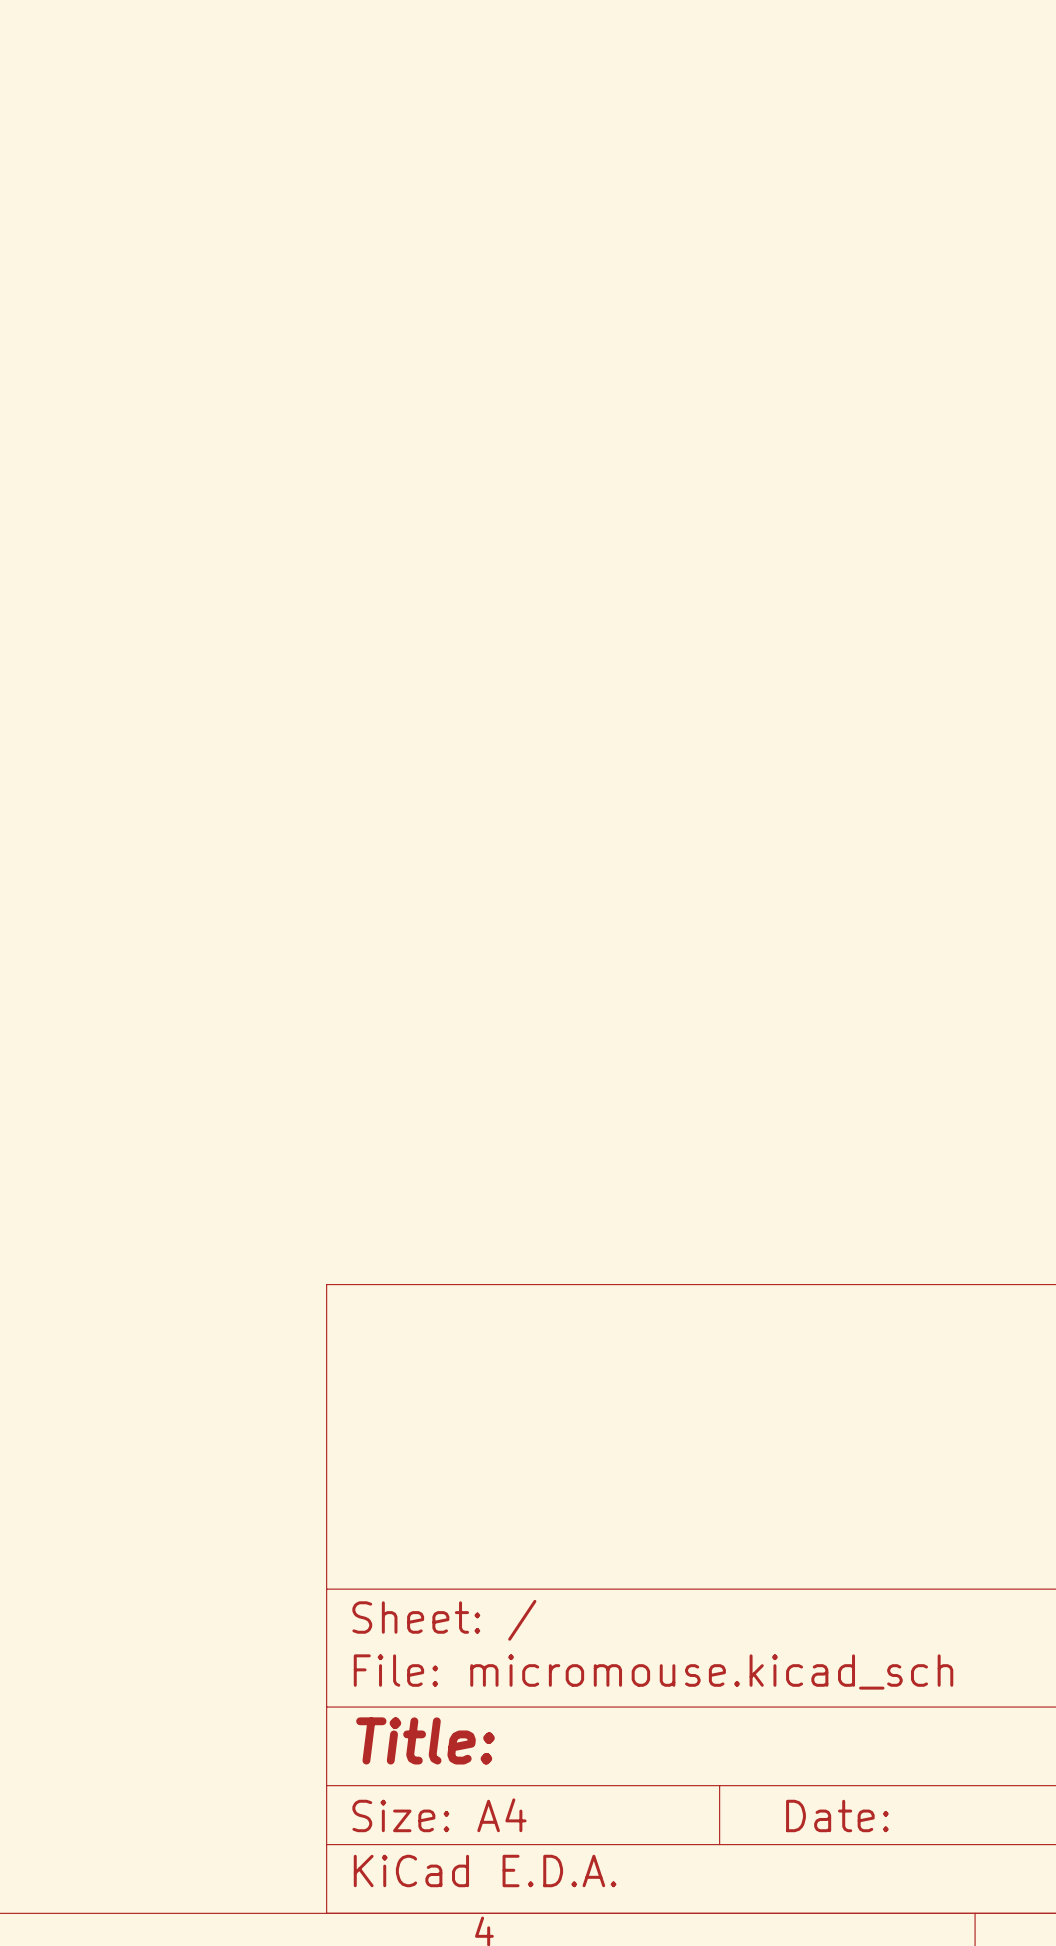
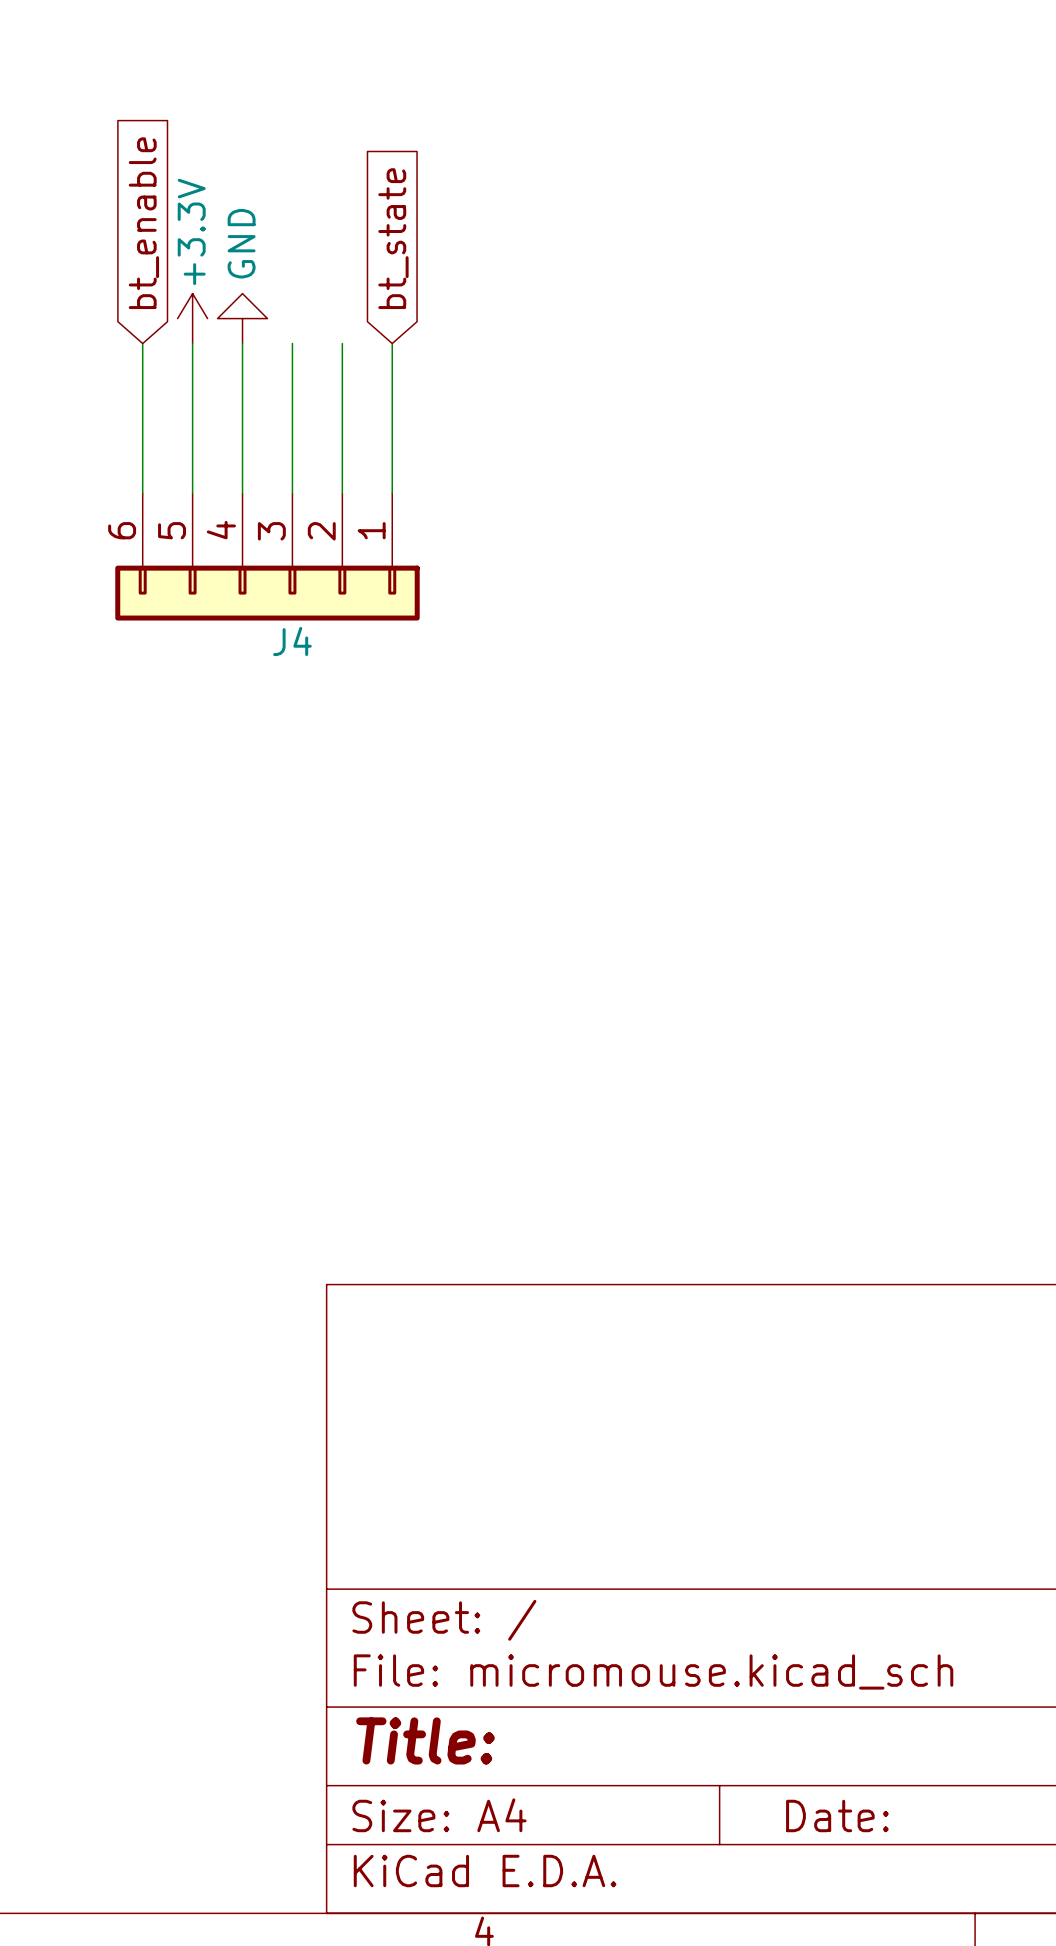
global label: none -> bt_enable (143, 223)
global label: none -> bt_state (393, 238)
power symbol: none -> +3.3V (192, 318)
power symbol: none -> GND (242, 318)
wire: none -> (142, 343) (142, 493)
wire: none -> (192, 343) (192, 493)
wire: none -> (242, 343) (242, 493)
wire: none -> (292, 343) (292, 493)
wire: none -> (342, 343) (342, 493)
wire: none -> (392, 343) (392, 493)
J4: none -> (267, 556)

